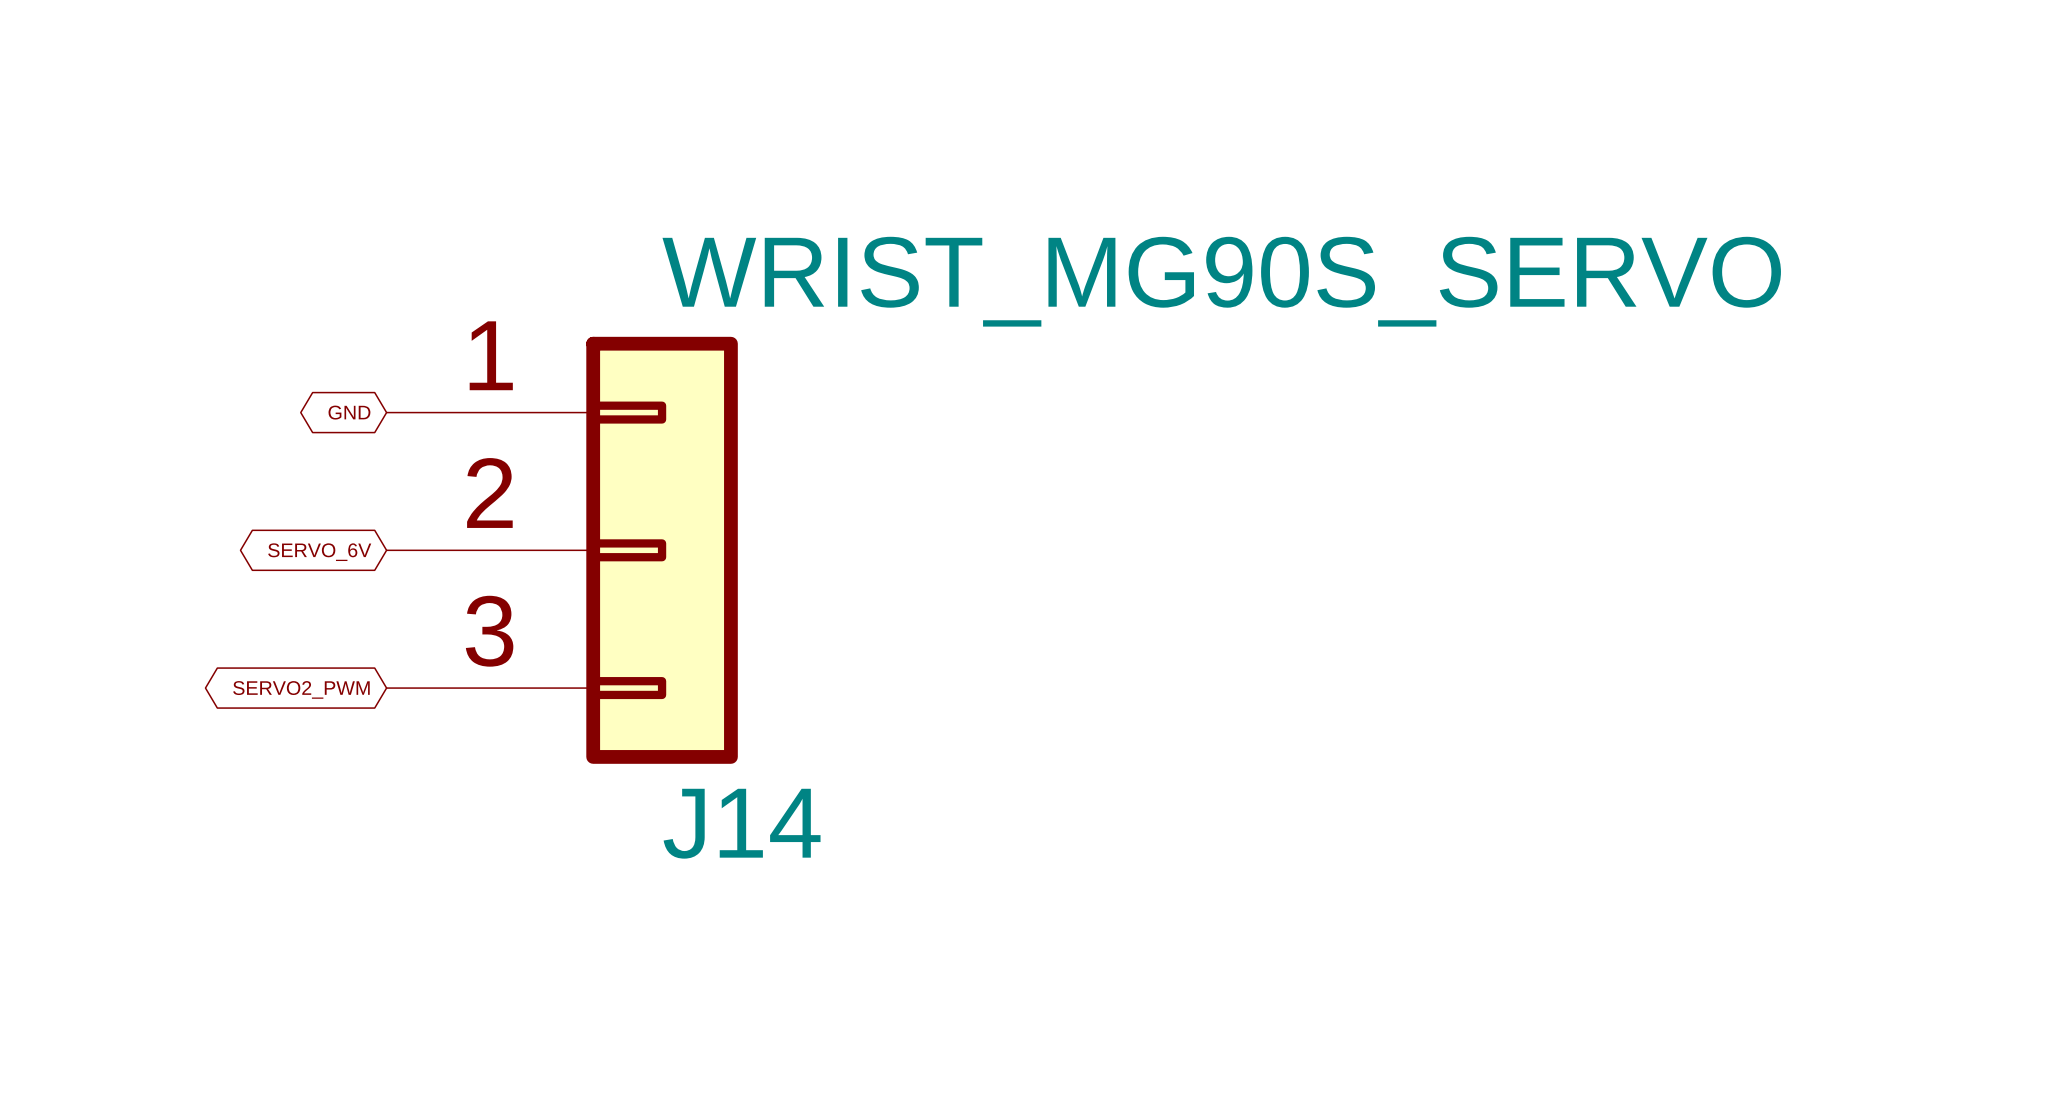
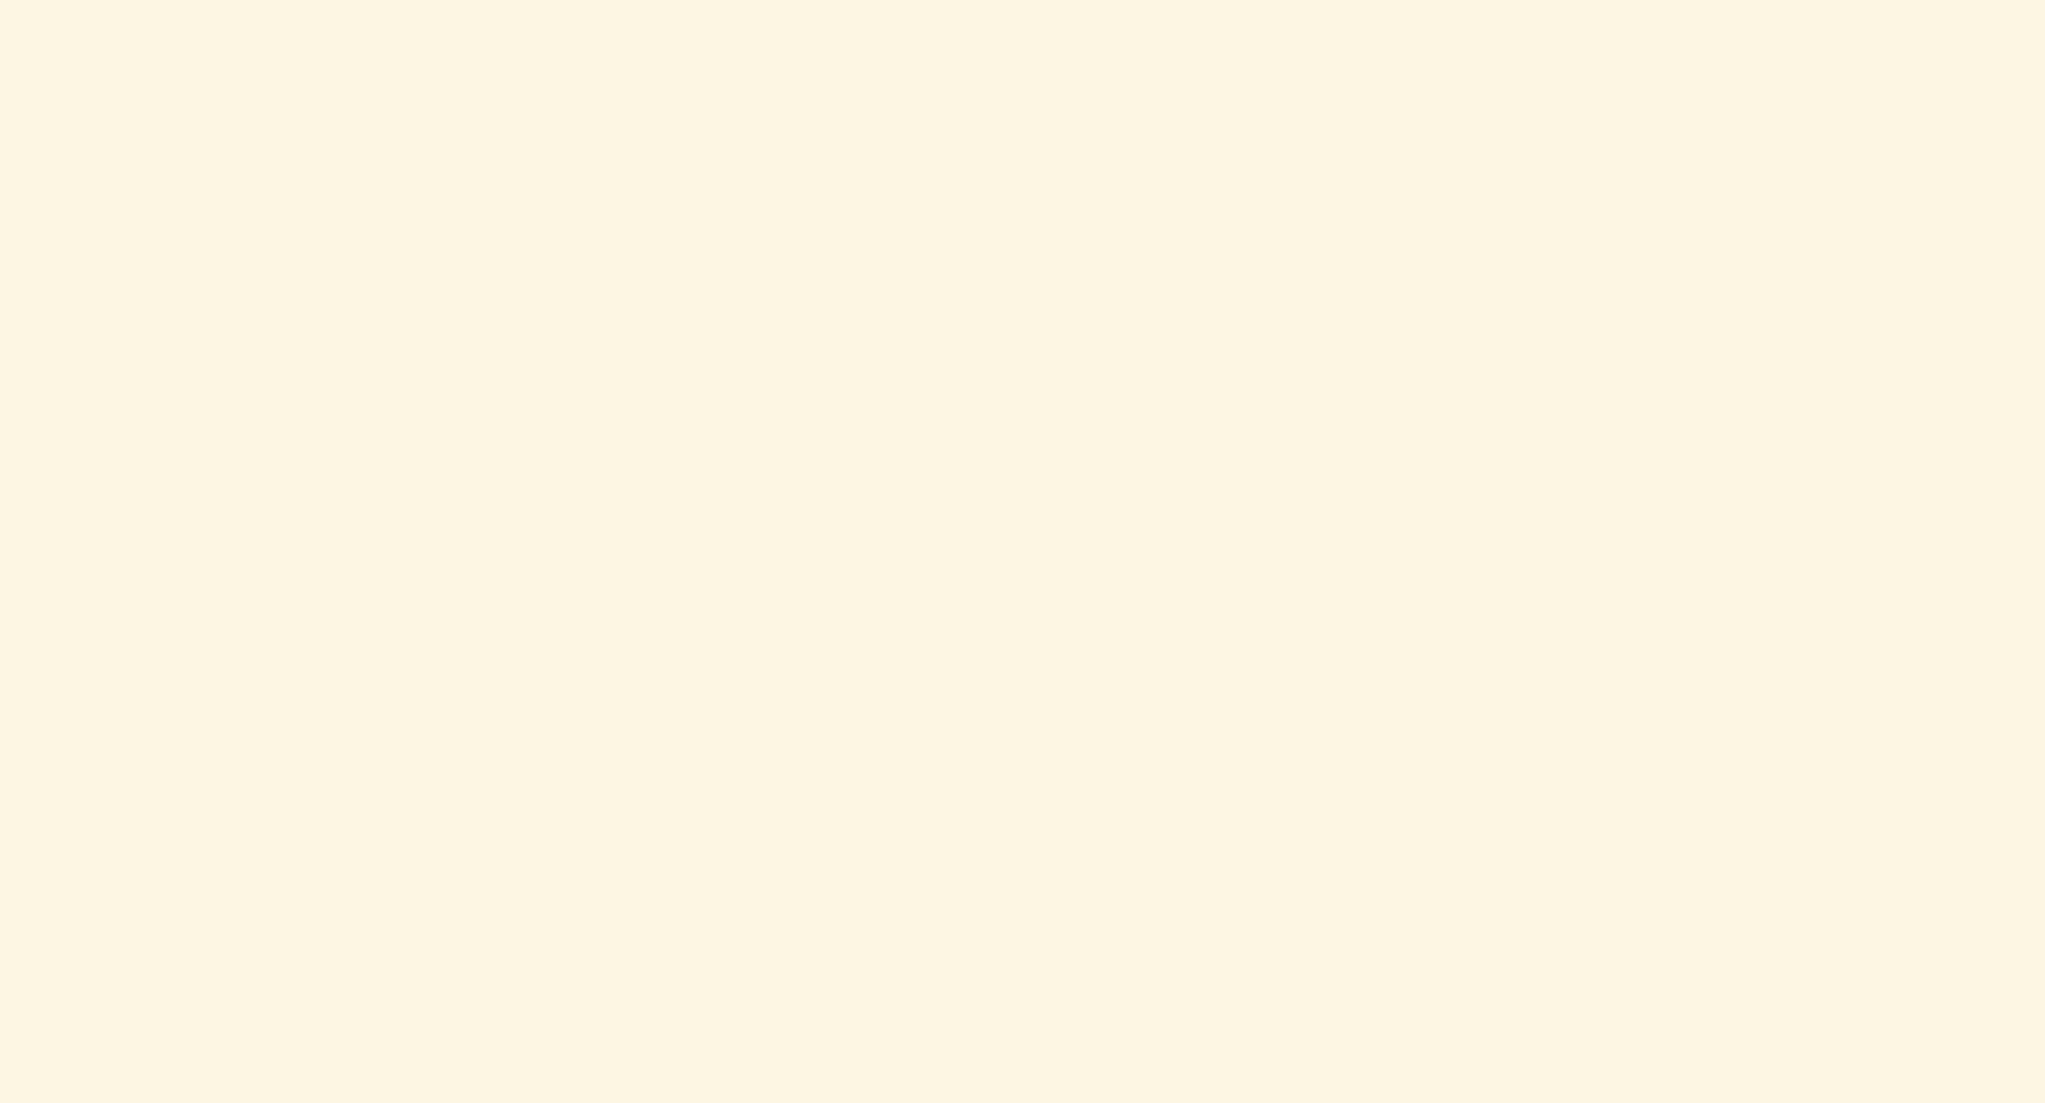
global label: GND (349, 412) -> none
J14: WRIST_MG90S_SERVO (562, 550) -> none
global label: SERVO_6V (319, 552) -> none
global label: SERVO2_PWM (301, 689) -> none

